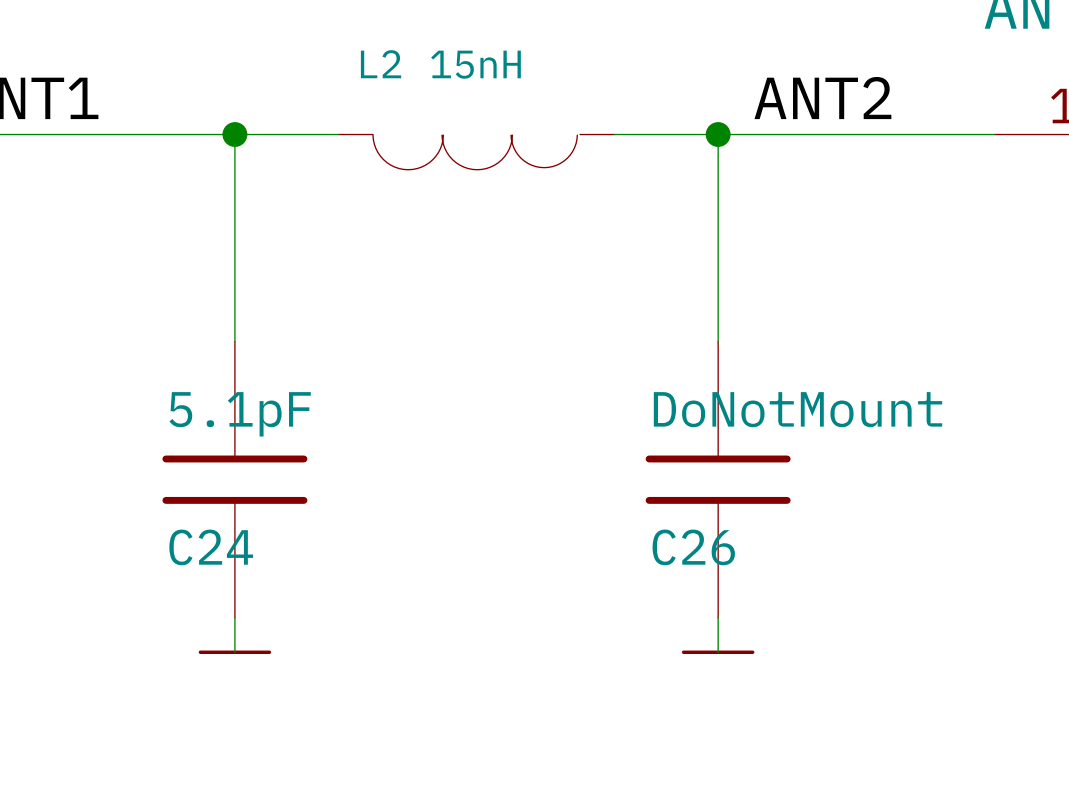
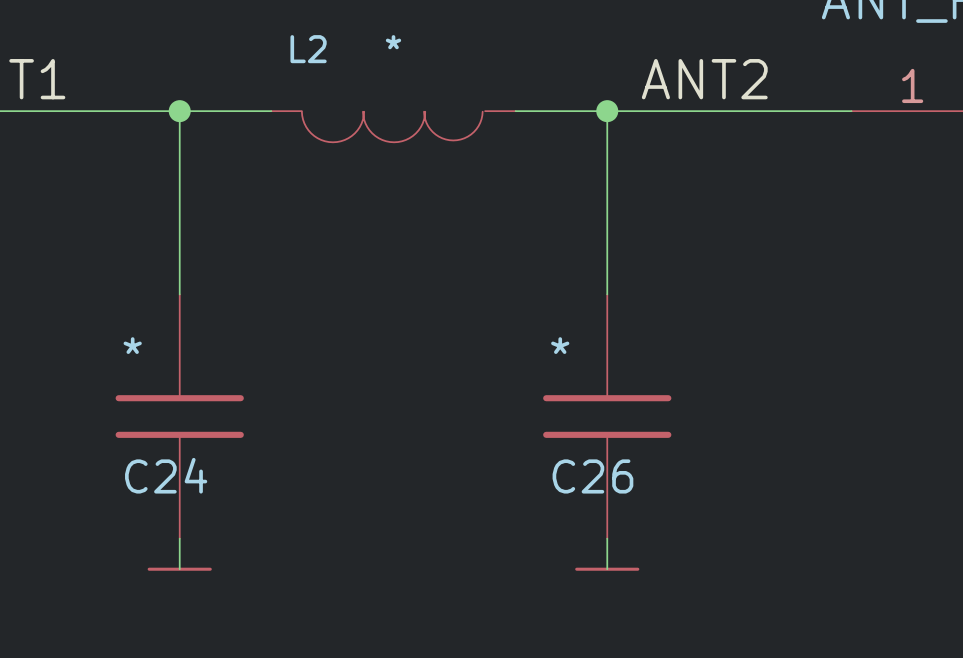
L2 value: 15nH (476, 64) -> * (393, 42)
C26 value: DoNotMount (797, 409) -> * (560, 345)
C24 value: 5.1pF (240, 414) -> * (132, 345)

